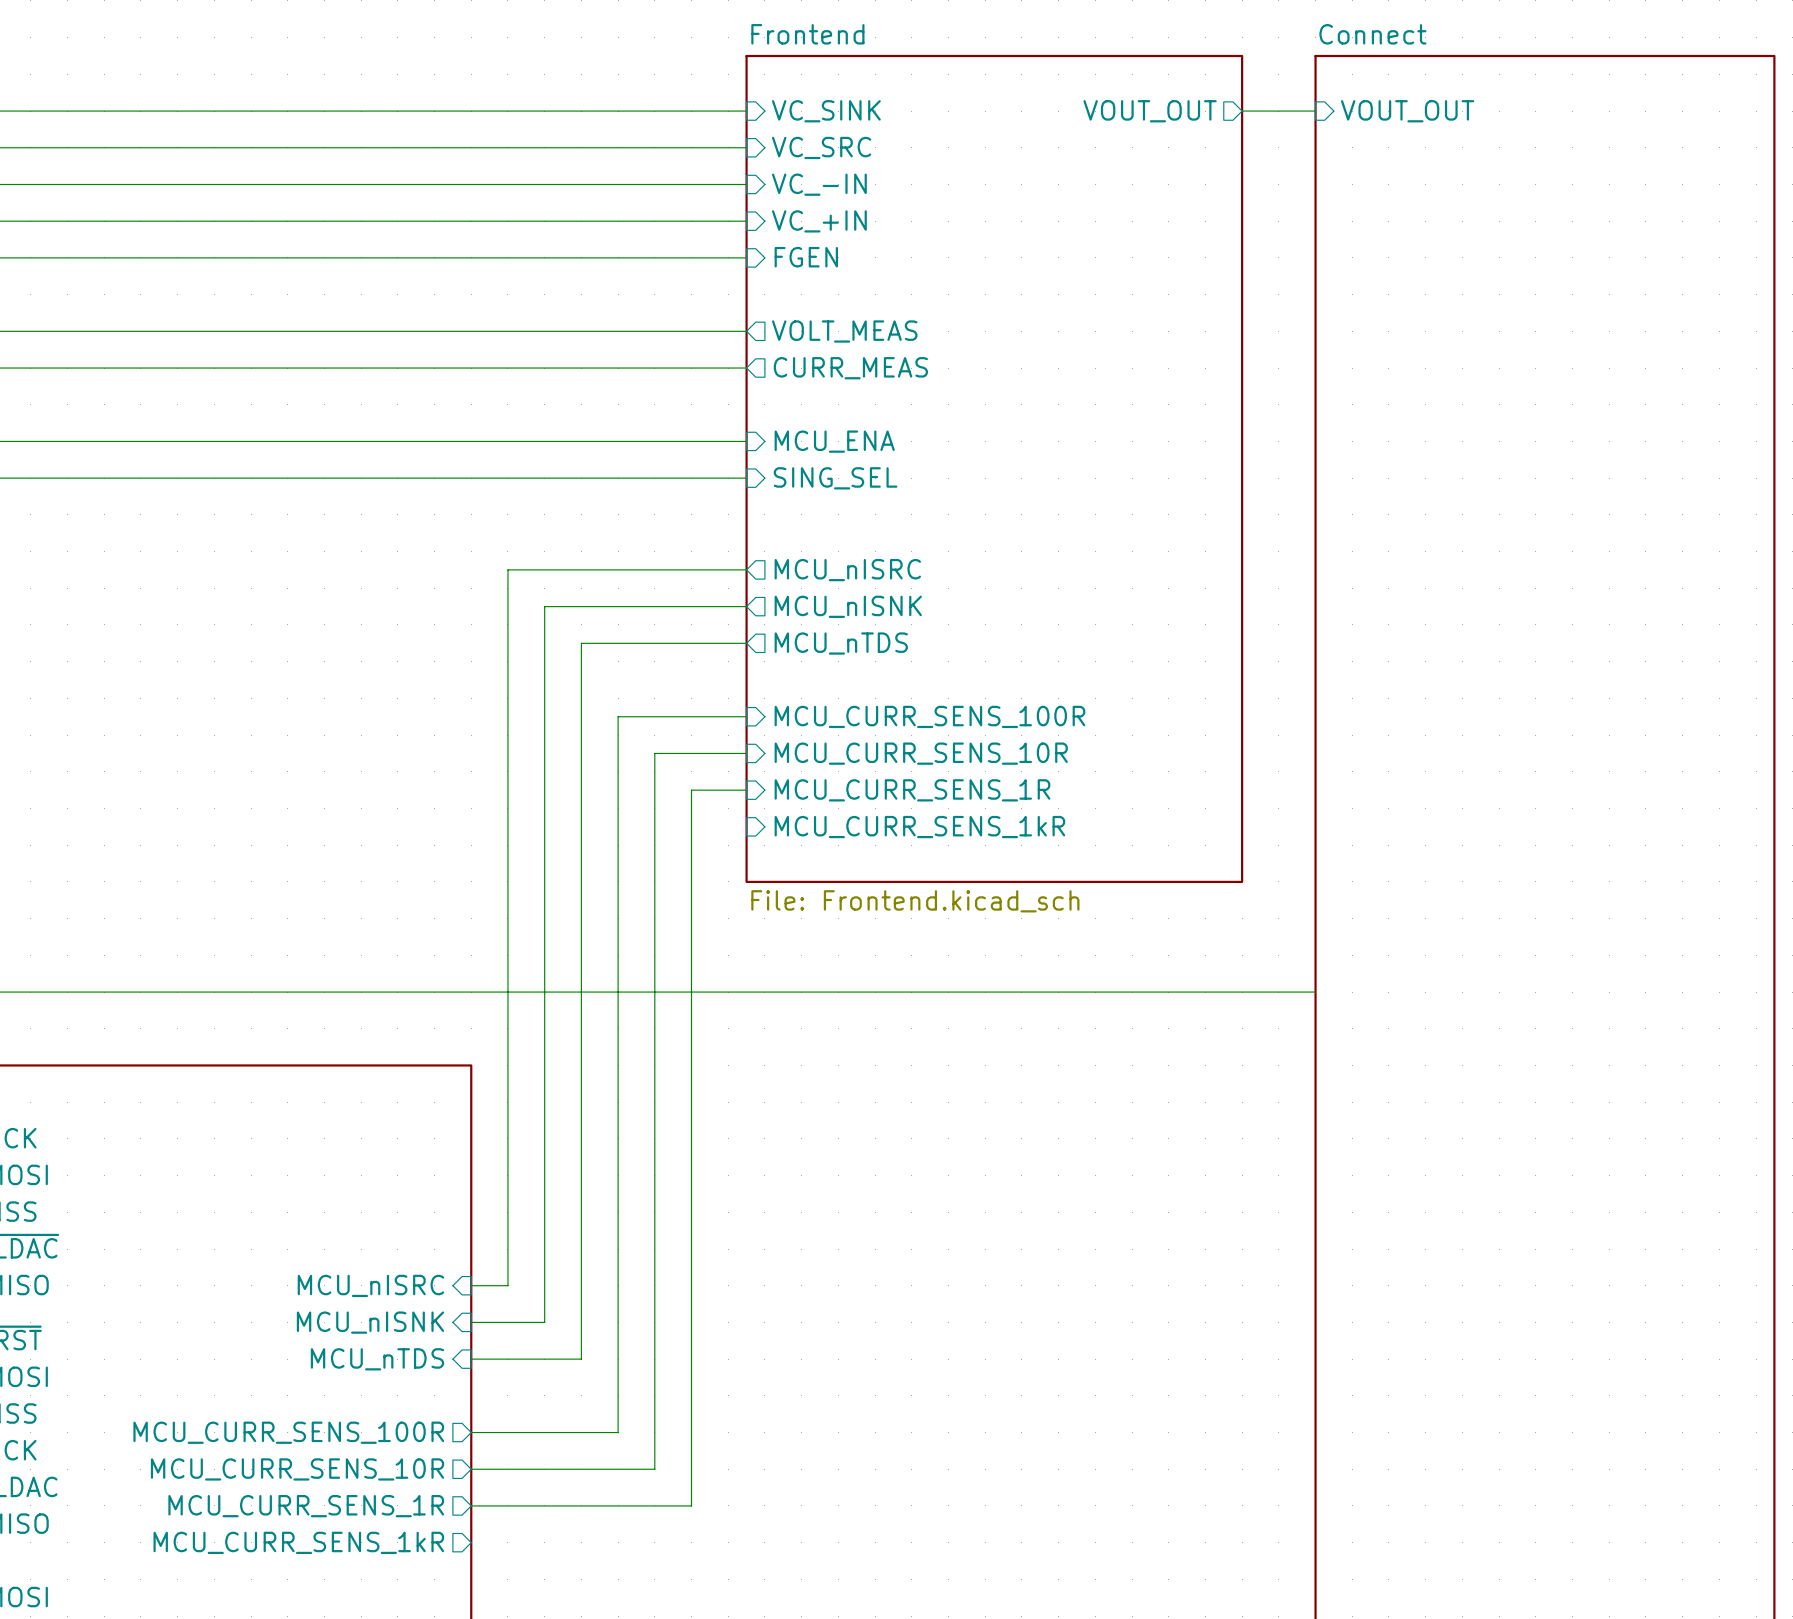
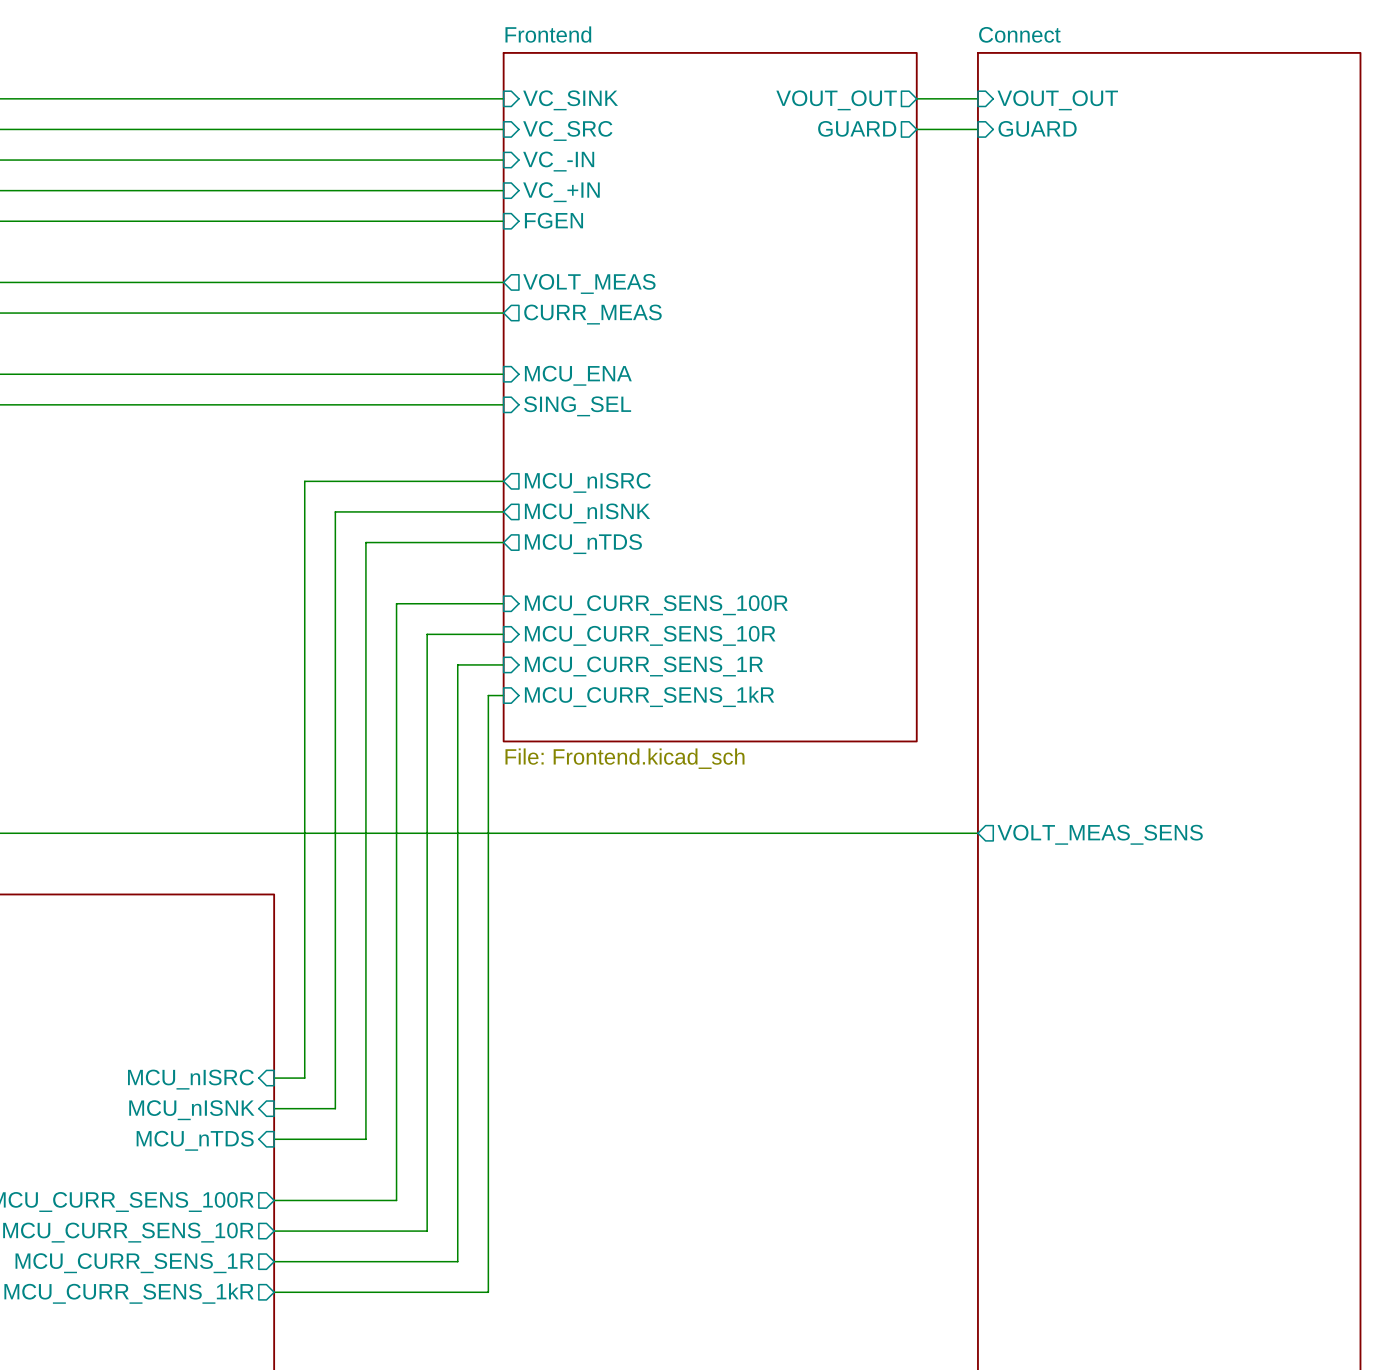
sheet pin: none -> GUARD (857, 128)
wire: none -> (916, 129) (977, 129)
sheet pin: none -> GUARD (1037, 128)
wire: none -> (503, 695) (488, 695) (488, 1292) (274, 1292)
sheet pin: none -> VOLT_MEAS_SENS (1100, 834)

